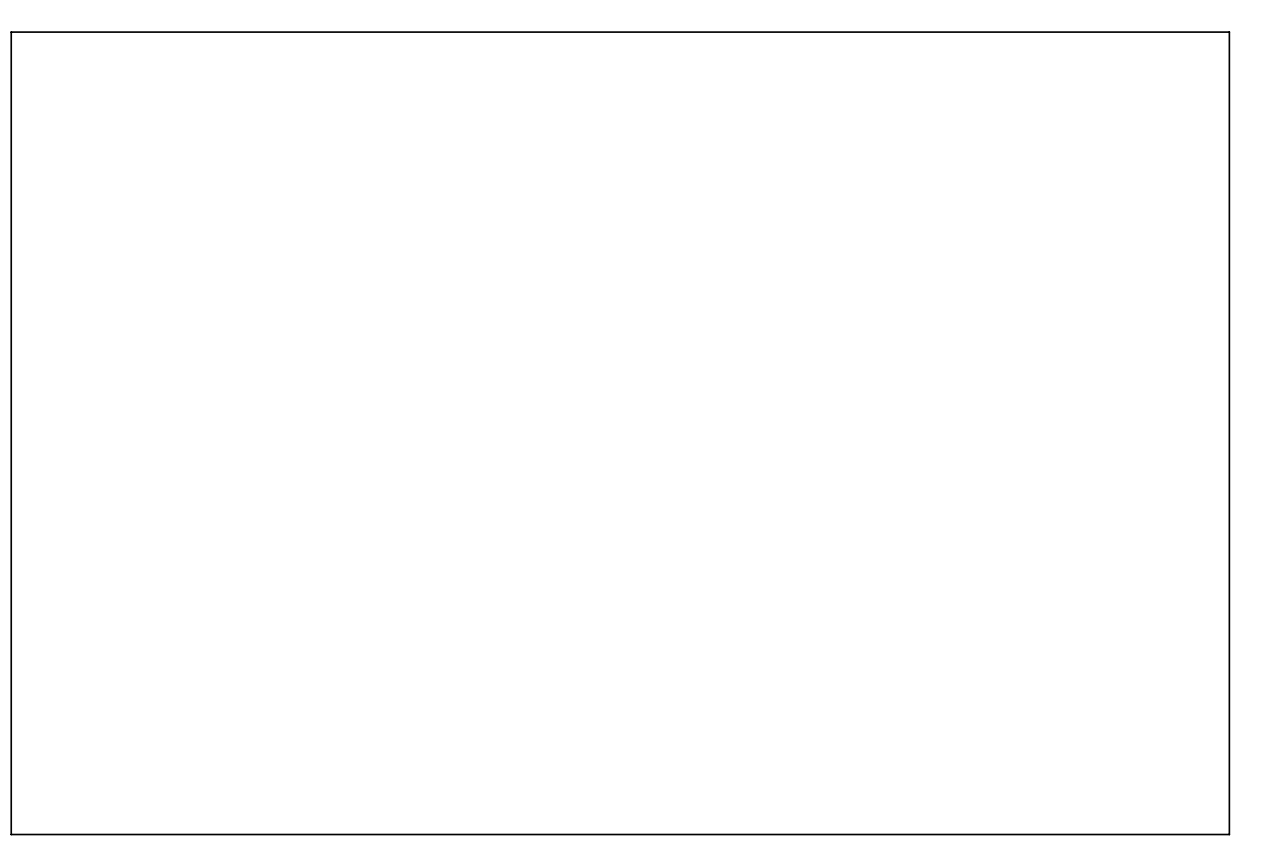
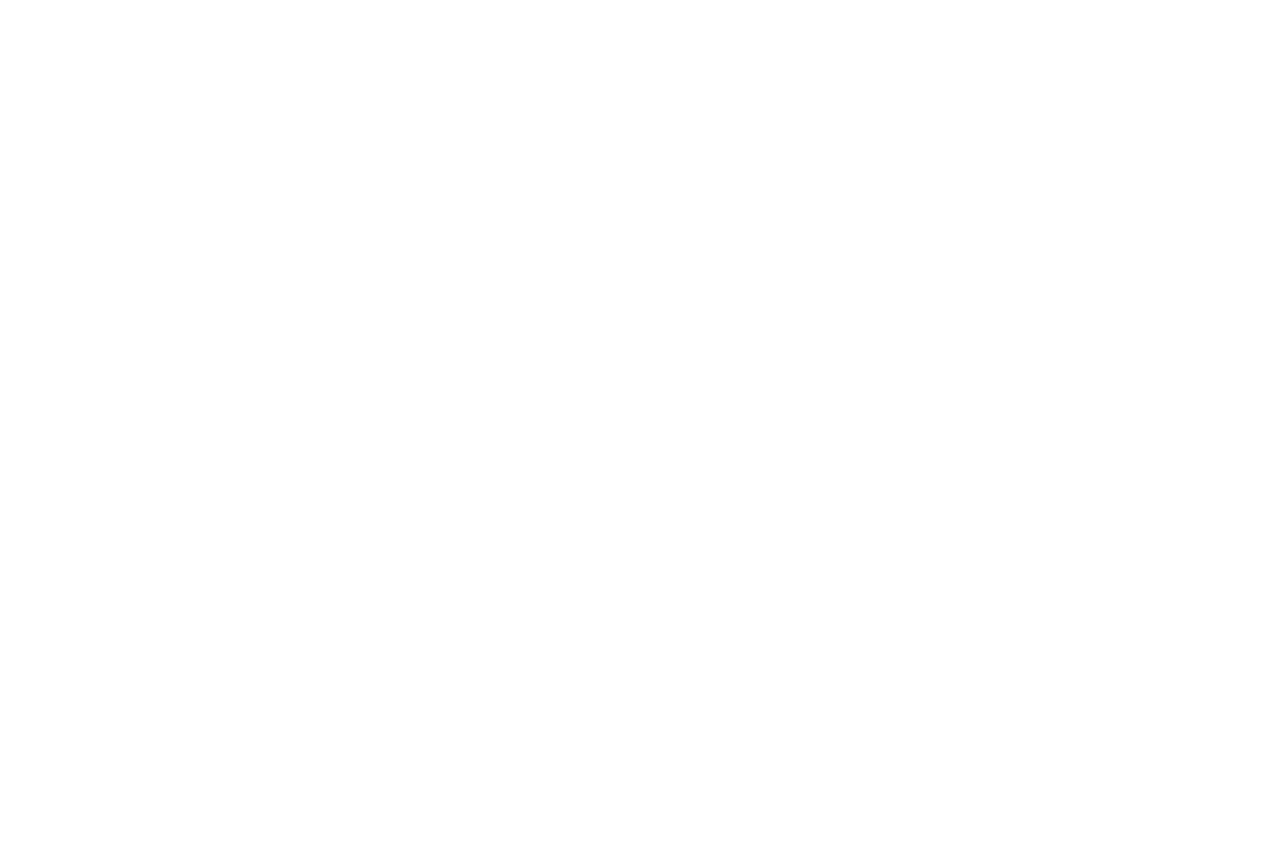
board edge: (11, 32) (1229, 32) (1229, 834) (11, 834) (11, 32) -> none

